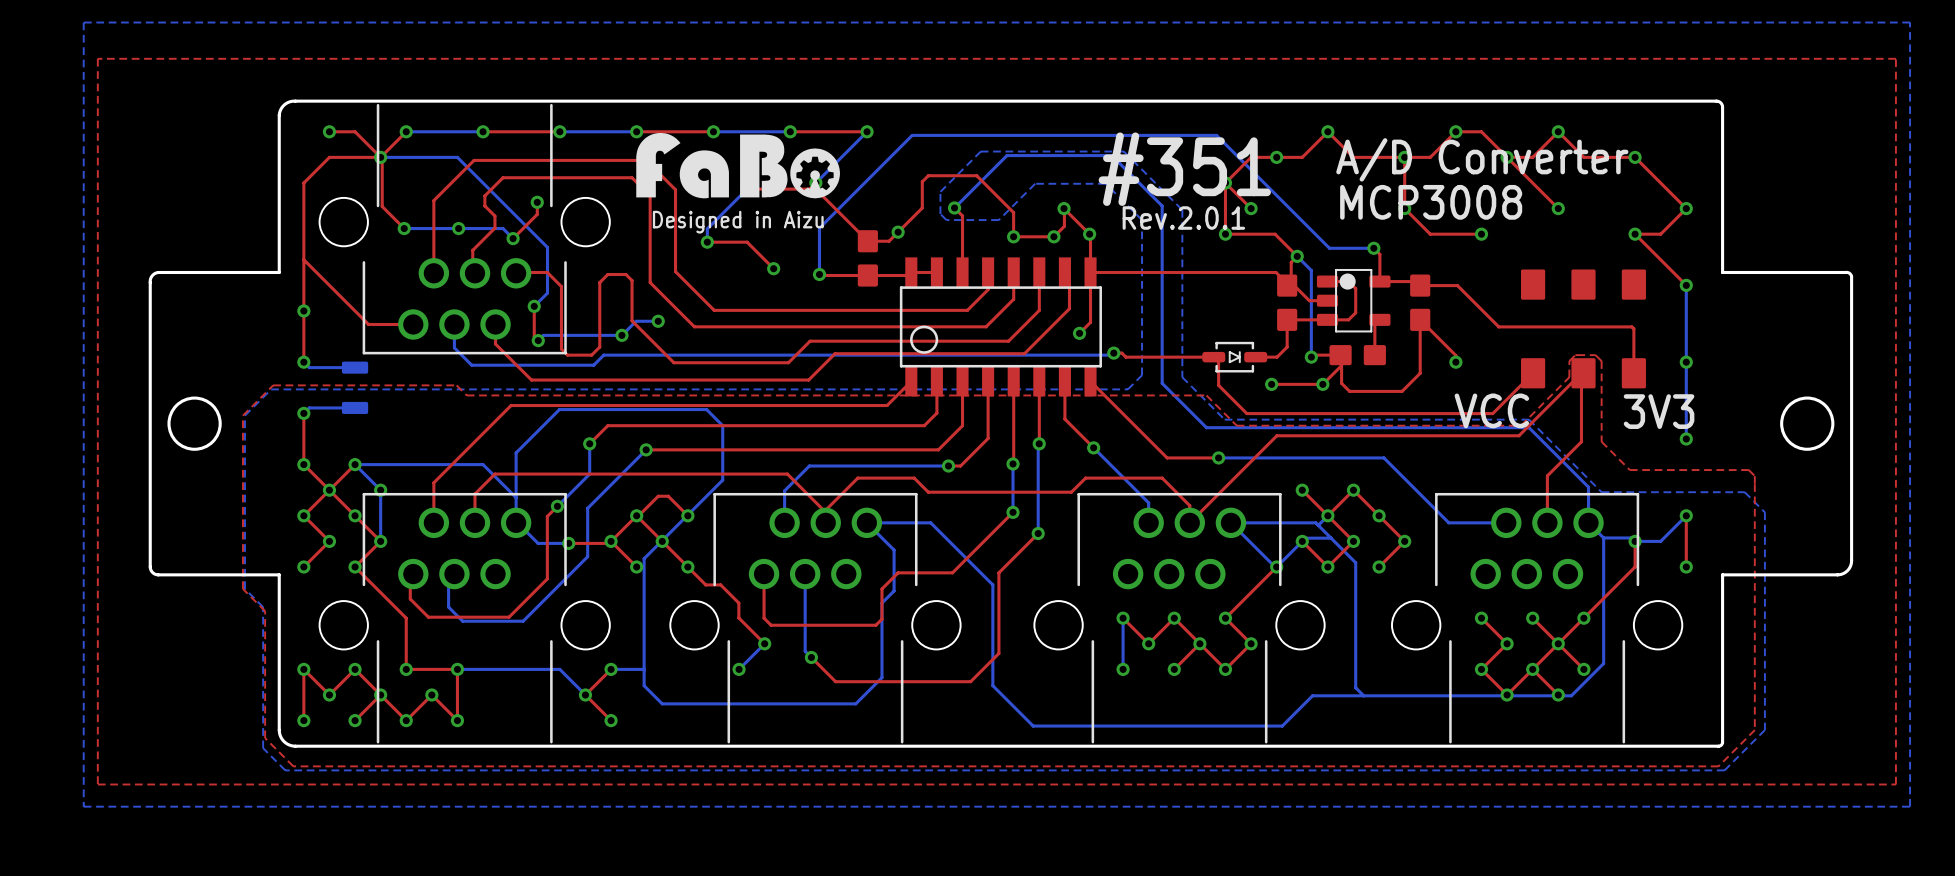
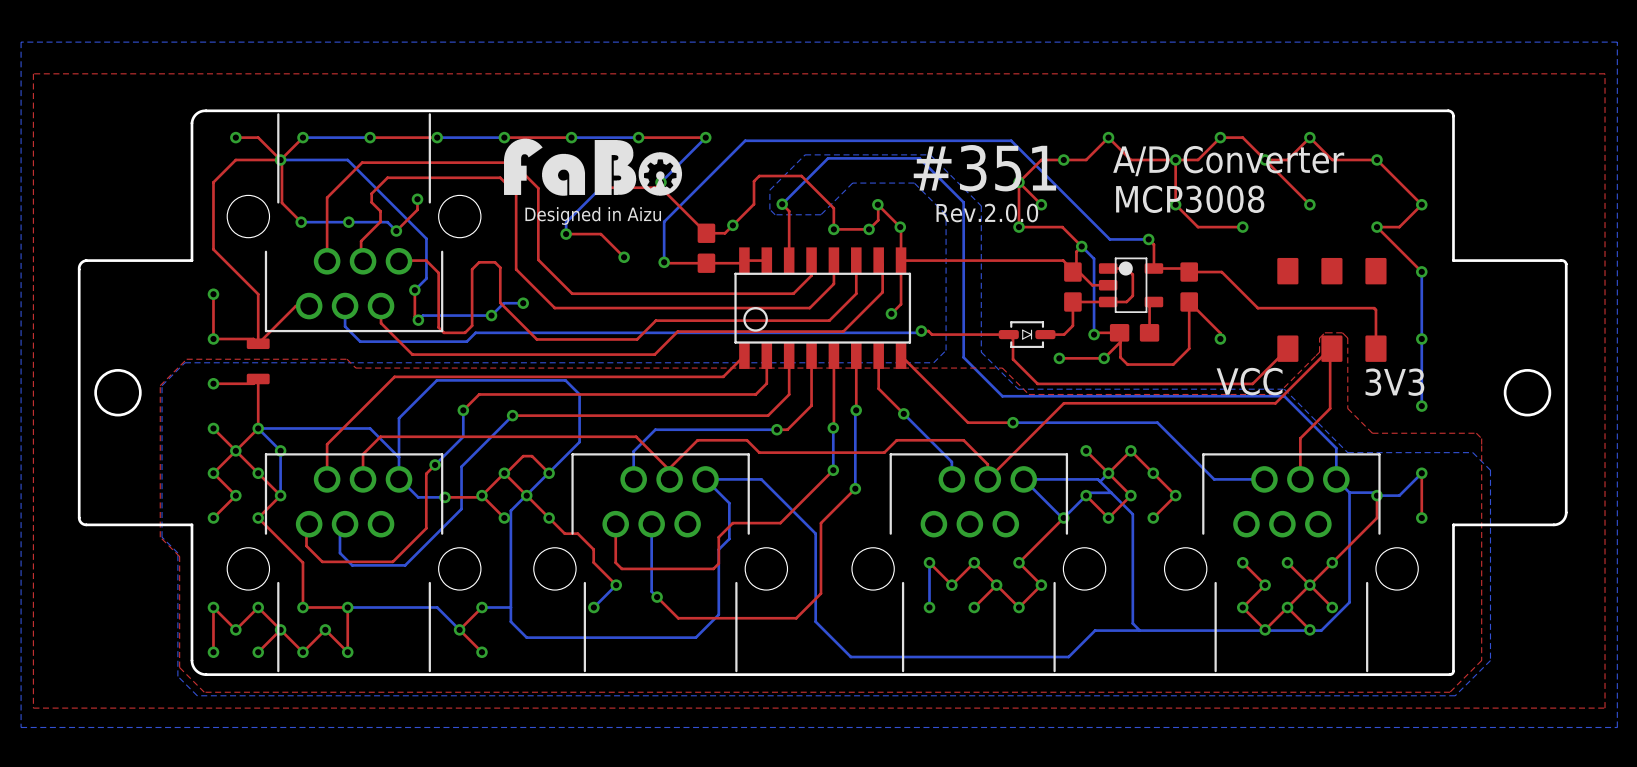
text: Rev.2.0.1 (1183, 218) -> Rev.2.0.0 (987, 212)
top track: (303, 259) (303, 310) -> none
top track: (355, 310) (368, 324) (398, 324) -> (258, 343) (295, 306)
top track: none -> (258, 294) (258, 343)
top track: none -> (213, 338) (253, 338) (258, 343)
bottom track: (303, 362) (309, 367) (355, 367) -> none
part side: bottom (355, 387) -> top (258, 361)
bottom track: (355, 407) (309, 407) (303, 413) -> none
top track: (303, 413) (303, 464) -> (213, 383) (253, 383) (258, 378) (258, 428)

